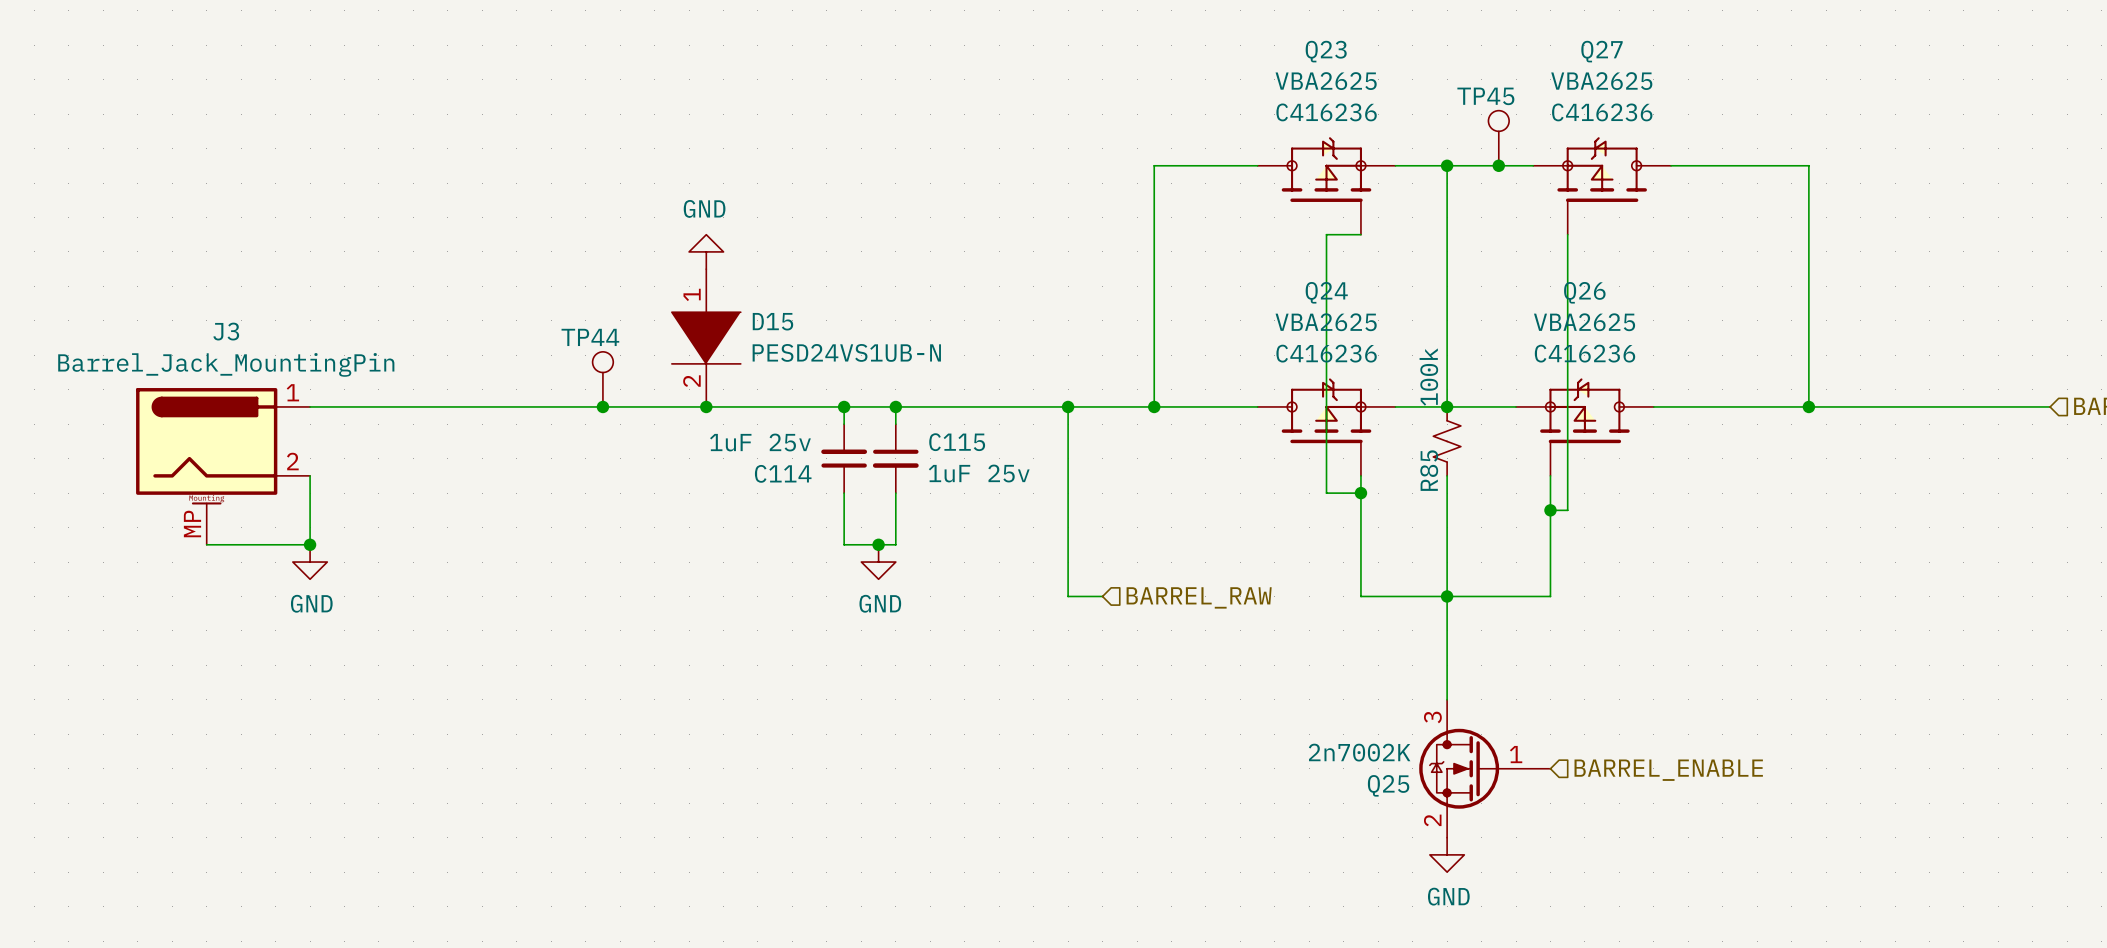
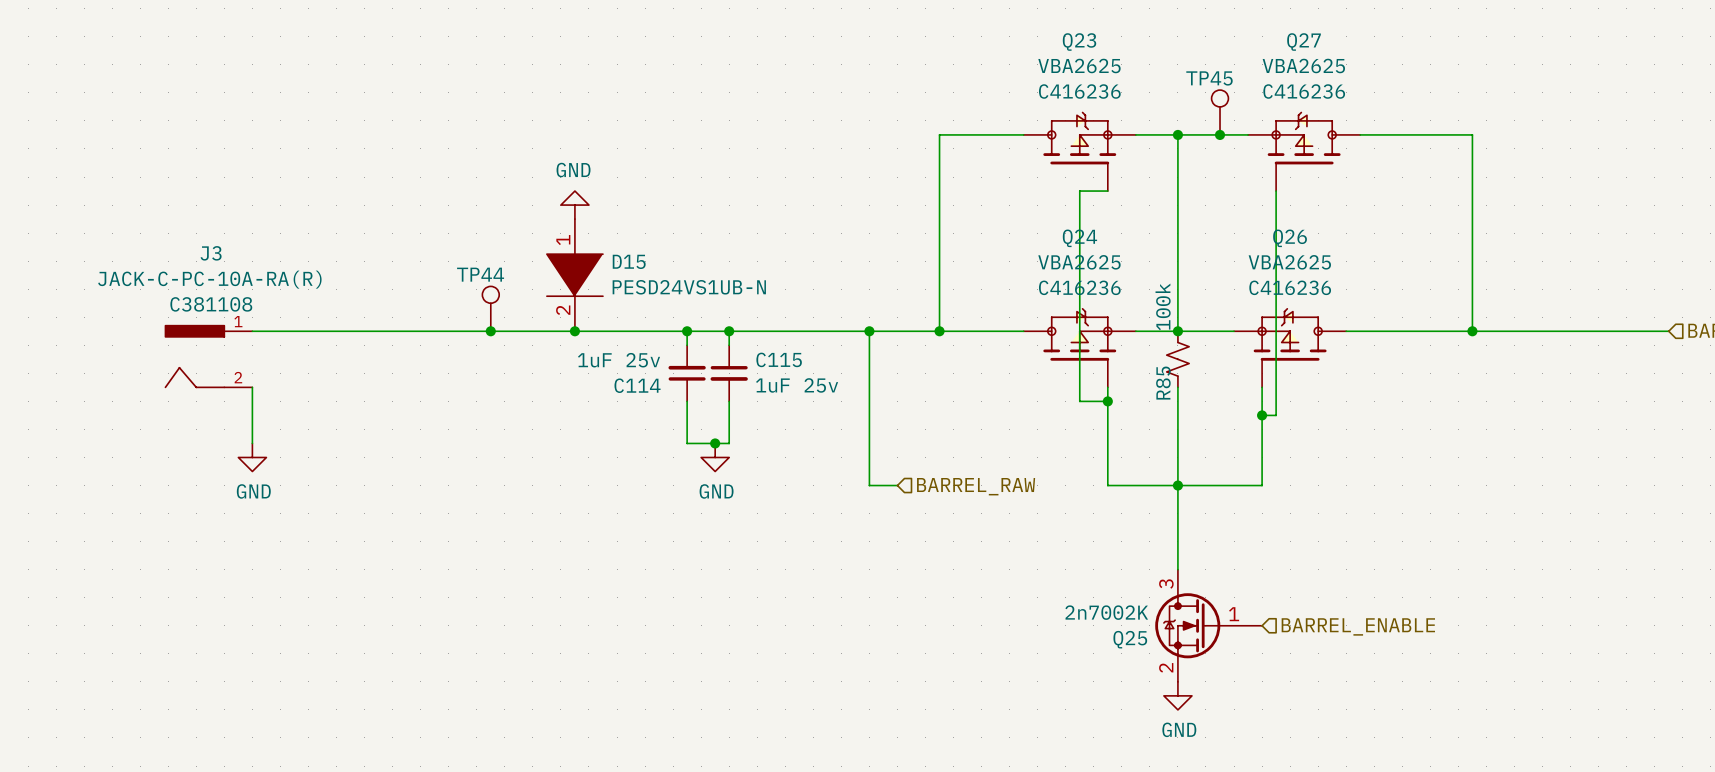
J3 value: Barrel_Jack_MountingPin (226, 364) -> JACK-C-PC-10A-RA(R) (209, 279)
J3 text: none -> C381108 (211, 304)
J3 symbol: [136, 388, 311, 545] -> [164, 325, 253, 389]
wire: (206, 544) (310, 544) -> none
junction: (310, 544) -> none

